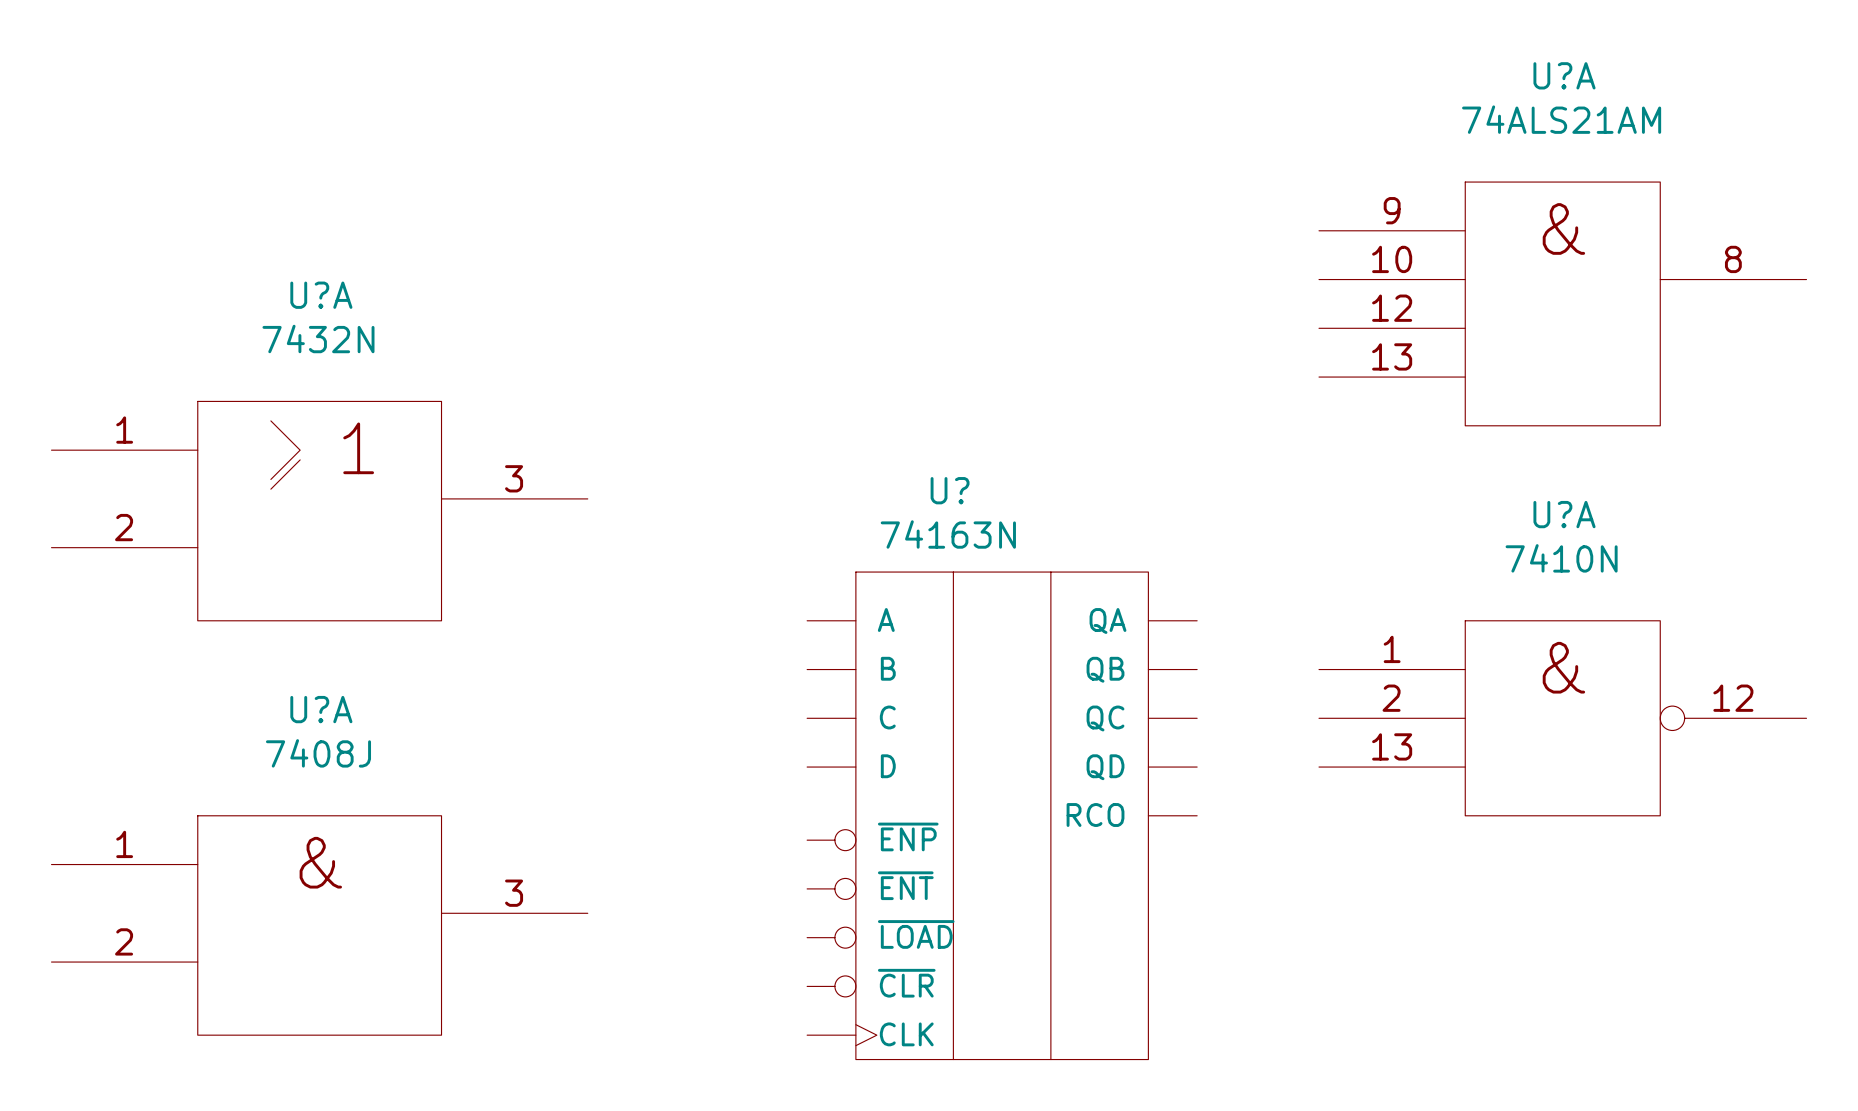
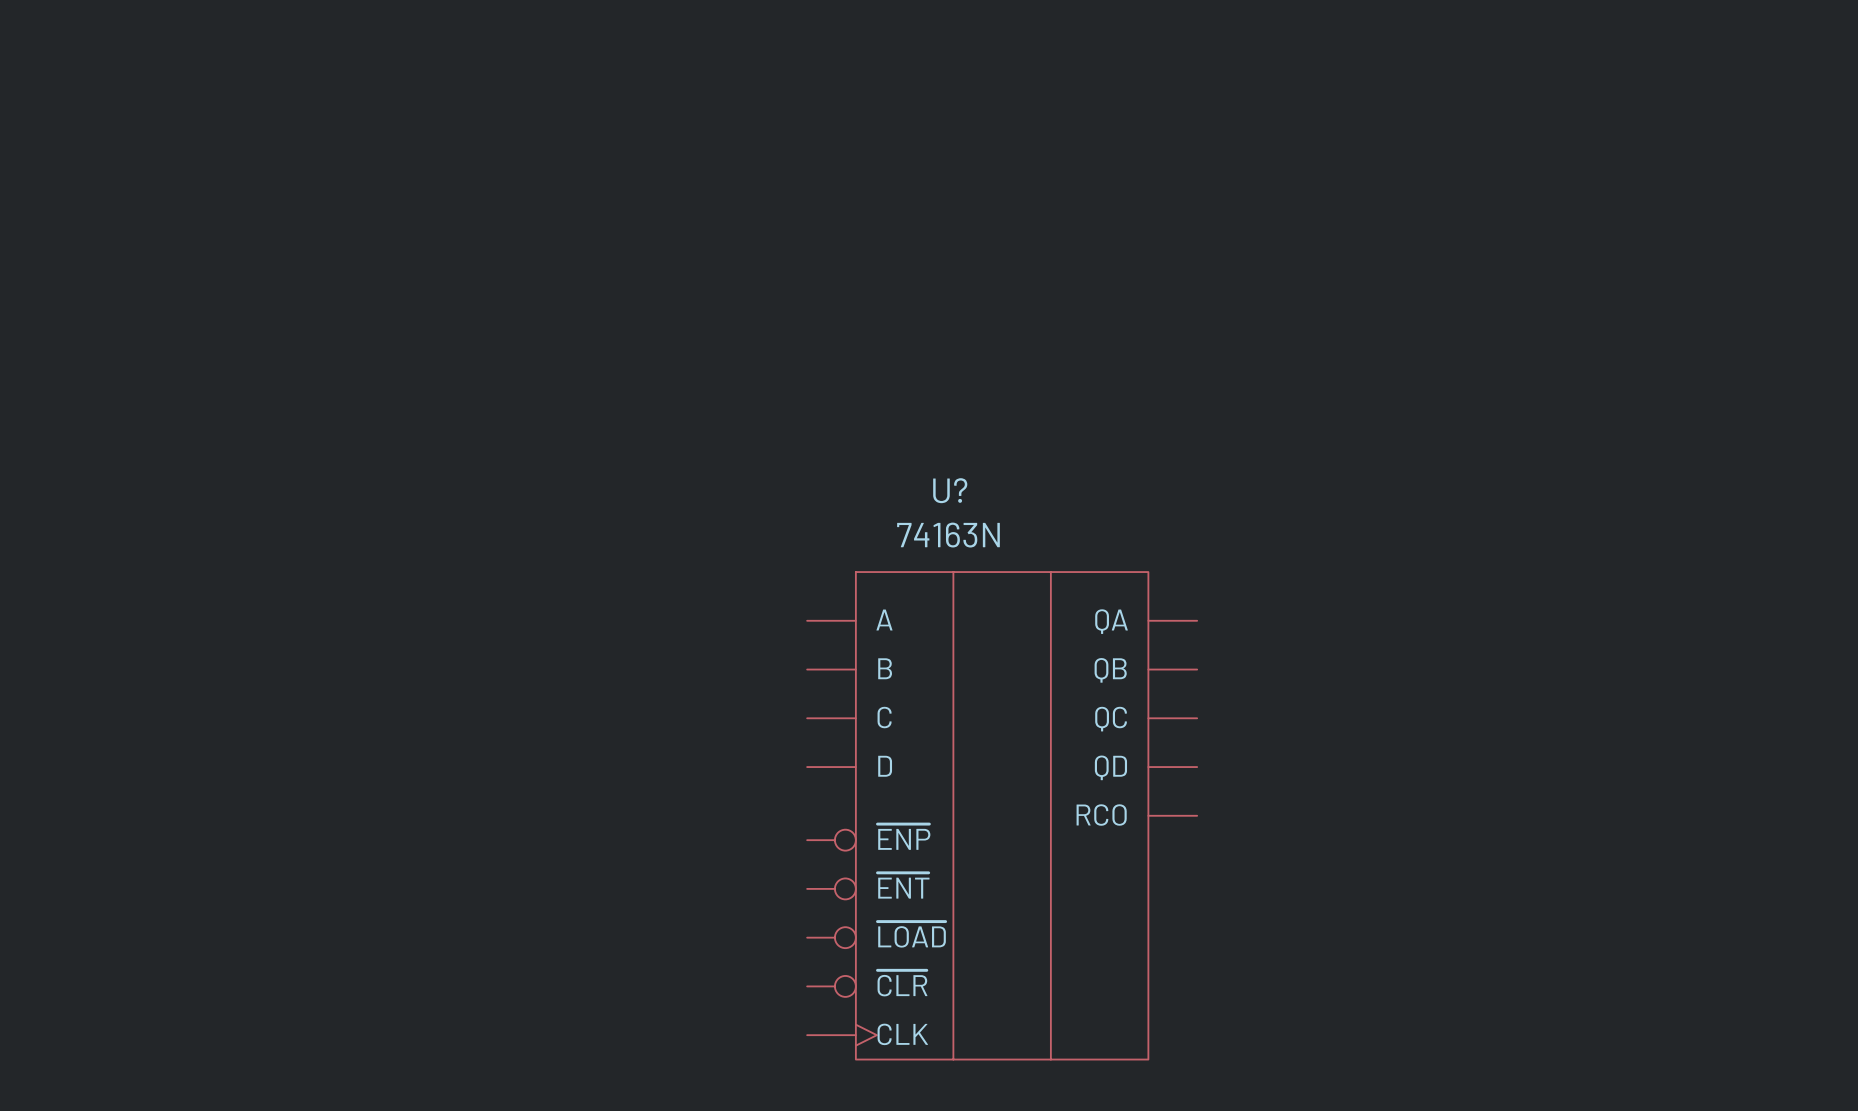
U?A: 74ALS21AM (1562, 303) -> none
U?A: 7432N (319, 511) -> none
U?A: 7410N (1562, 718) -> none
U?A: 7408J (319, 925) -> none

